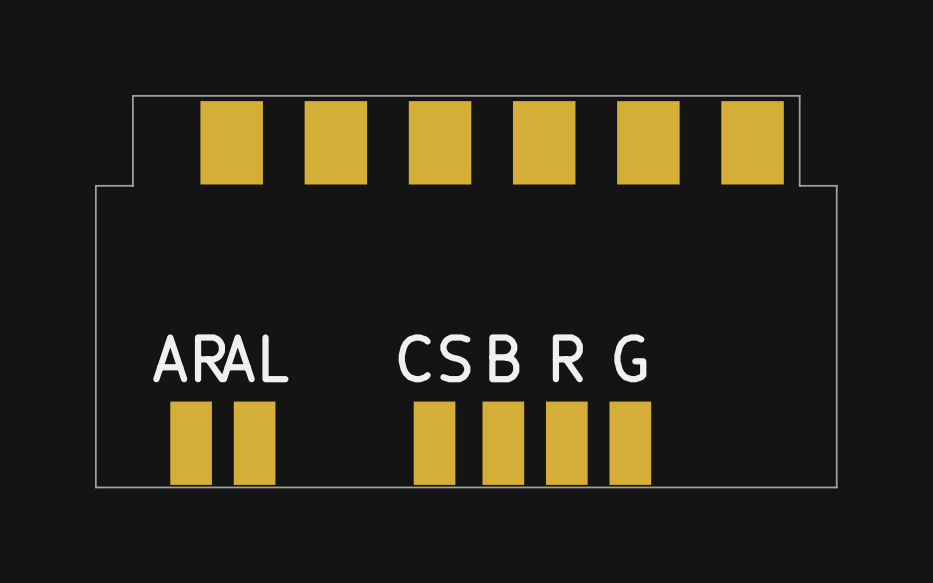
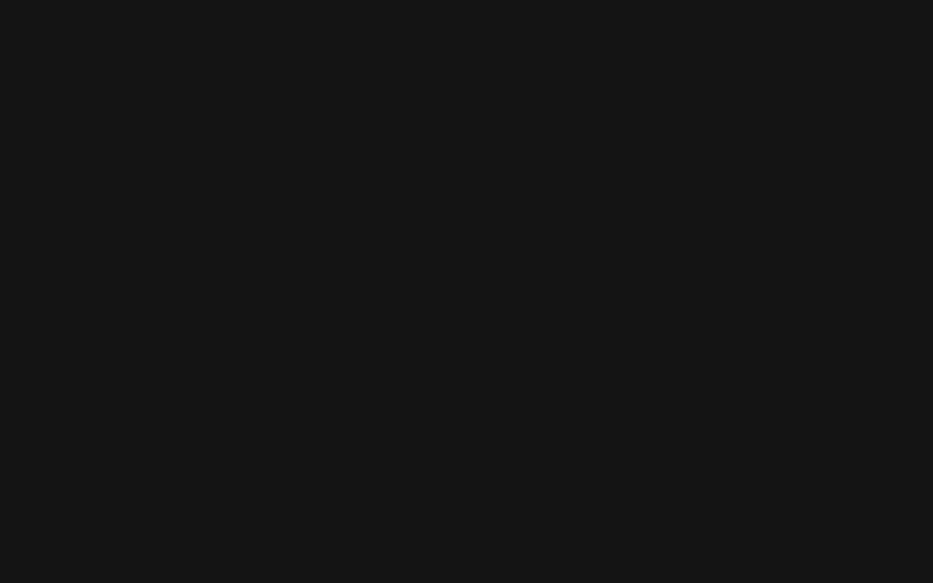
board edge: (799, 95) (132, 95) (132, 185) (95, 185) (95, 487) (836, 487) (836, 185) (799, 185) (799, 95) -> none
part: (492, 142) -> none
AR: (191, 443) -> none
AL: (254, 443) -> none
CS: (434, 443) -> none
B: (503, 443) -> none
R: (566, 443) -> none
G: (630, 443) -> none

